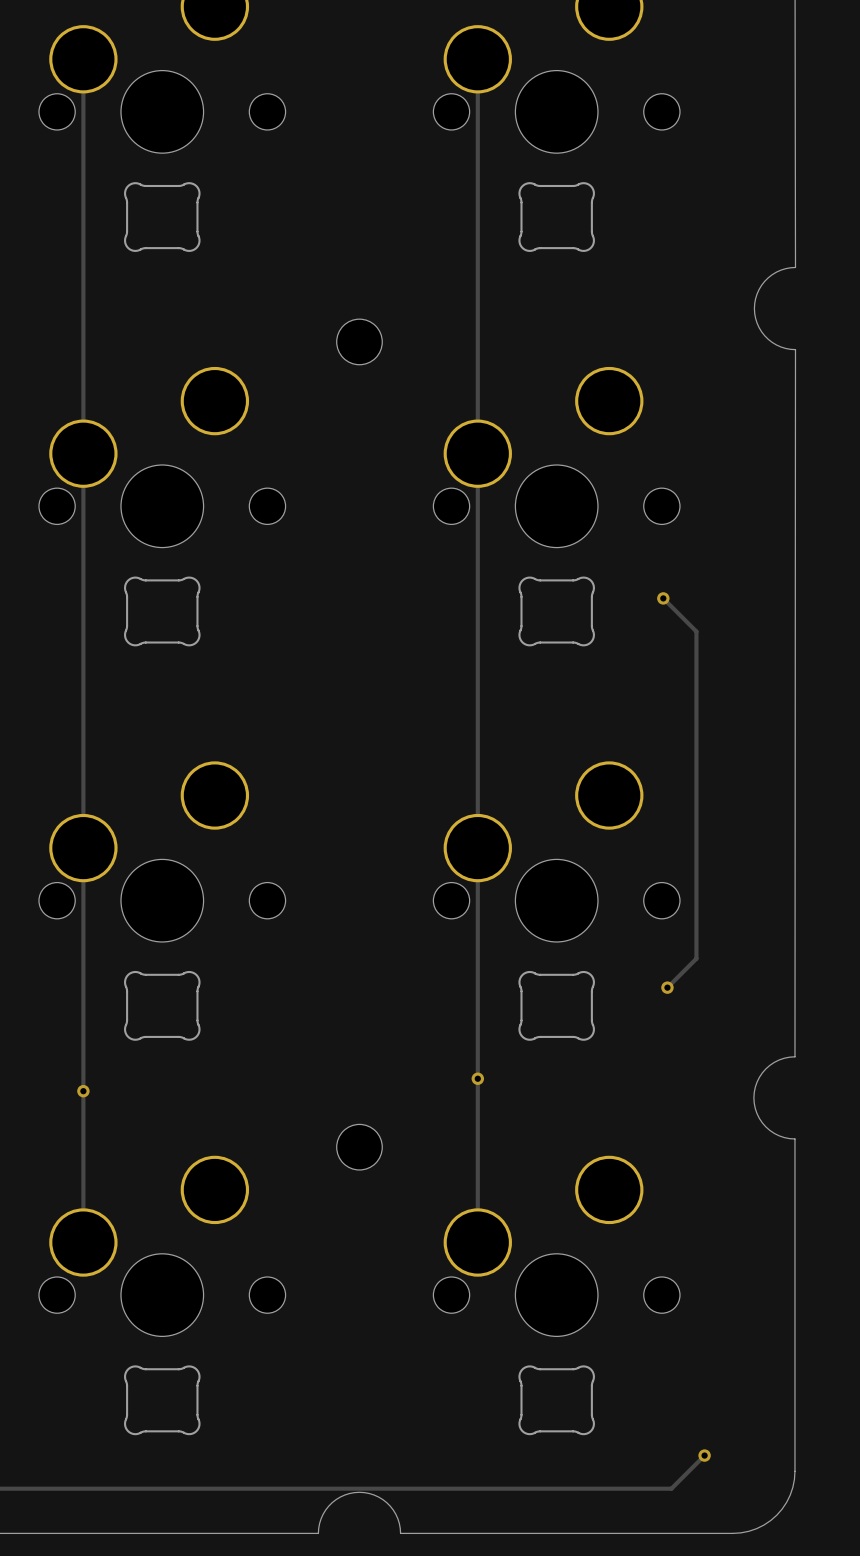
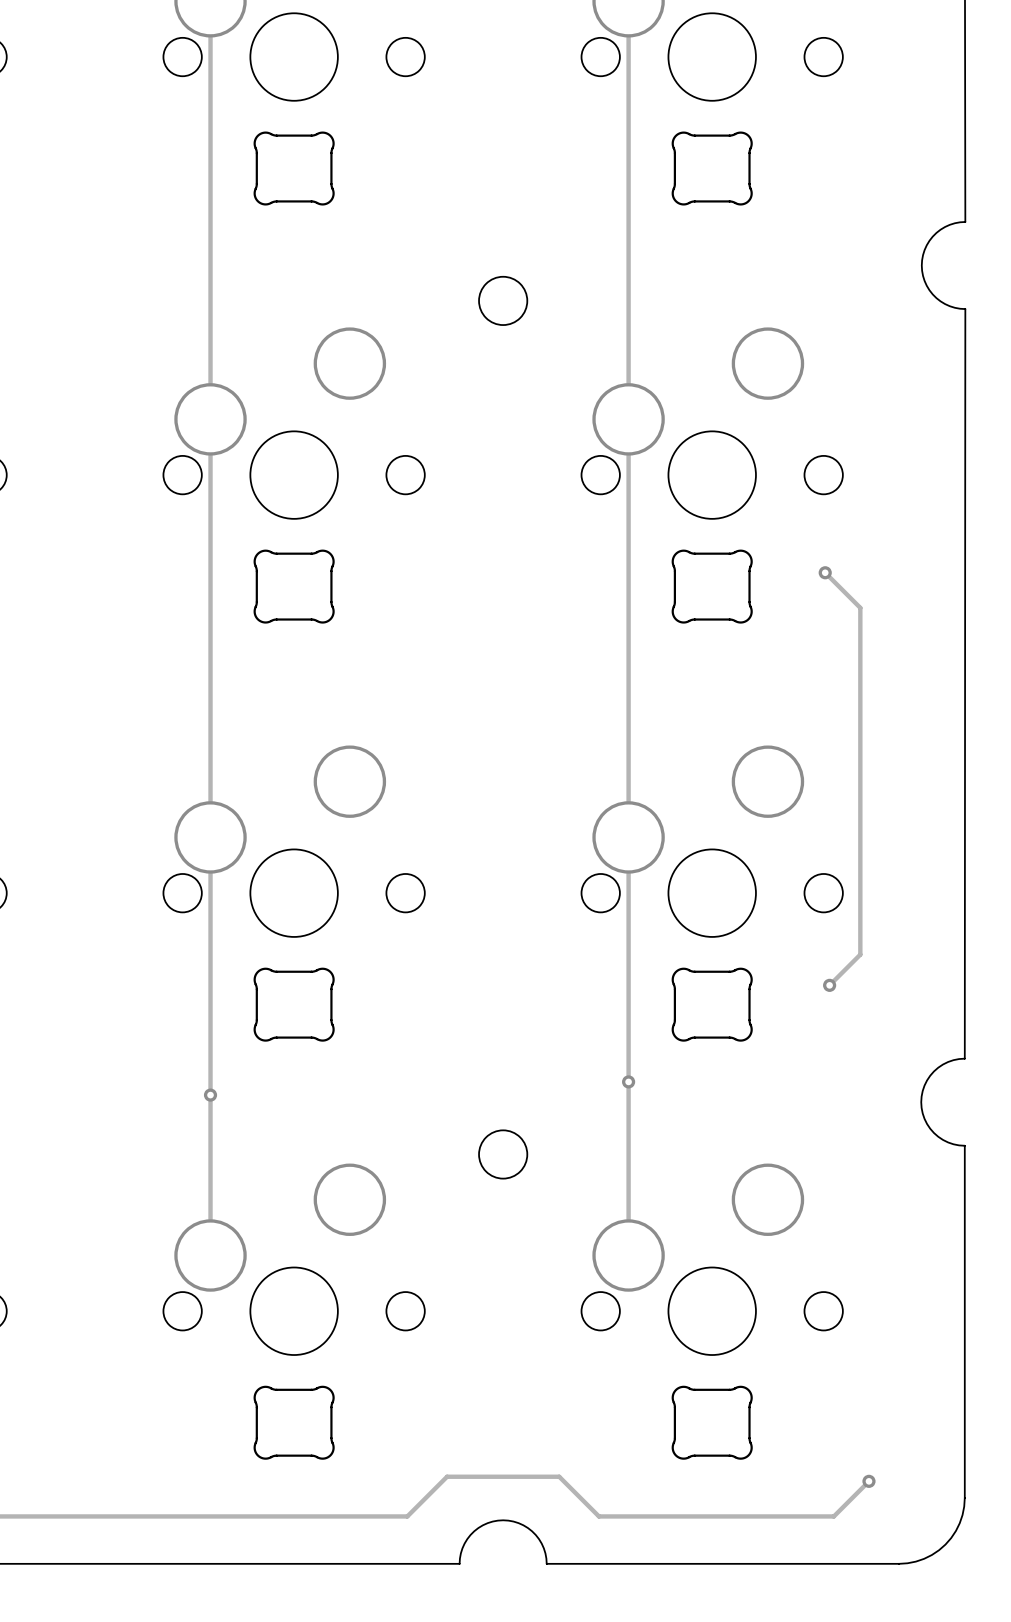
track: (269, 1488) (449, 1488) -> (407, 1516) (447, 1476) (559, 1476) (598, 1516)

